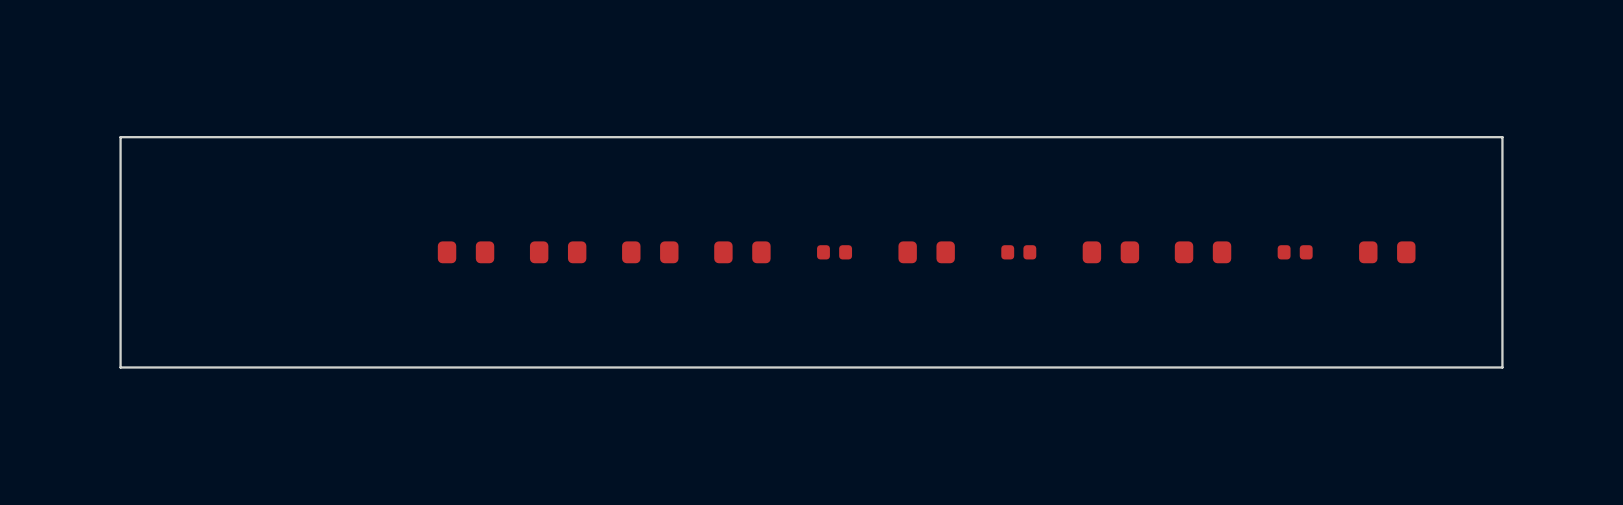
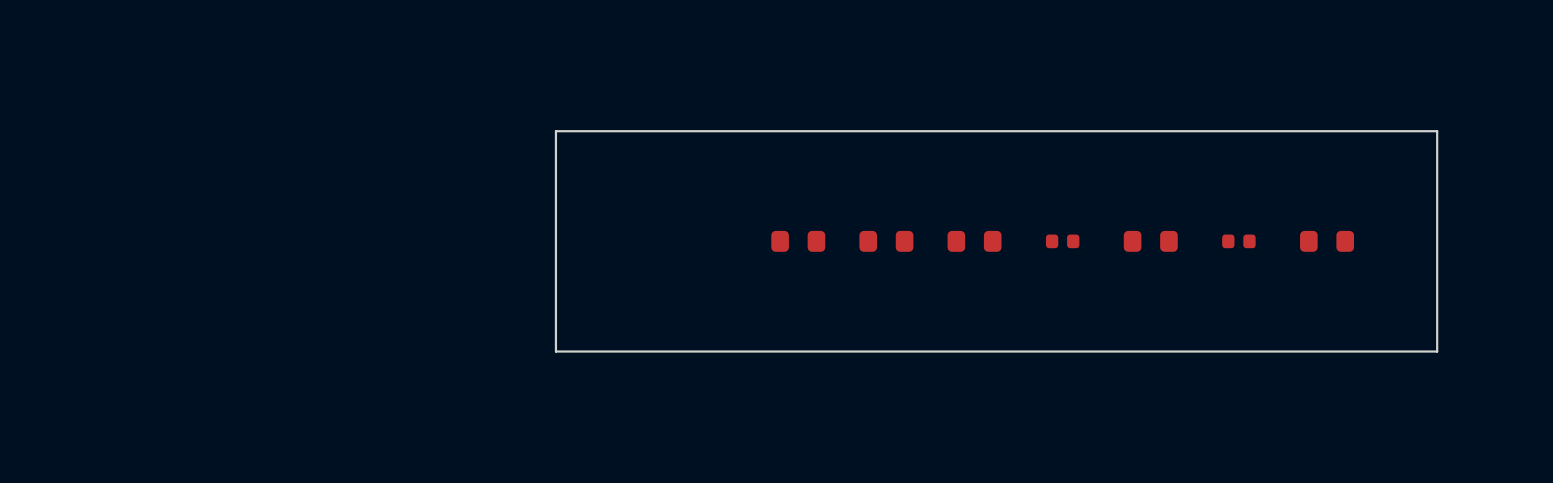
board edge: (581, 137) (120, 137) (120, 367) (581, 367) -> (555, 131) (555, 351)
part footprint: [1082, 241, 1140, 264] -> [1045, 234, 1080, 249]
part footprint: [817, 245, 853, 260] -> [771, 230, 826, 252]
part footprint: [1001, 245, 1037, 260] -> [947, 230, 1002, 252]
part: (466, 252) -> none
part: (558, 252) -> none
part: (650, 252) -> none
part: (742, 252) -> none

